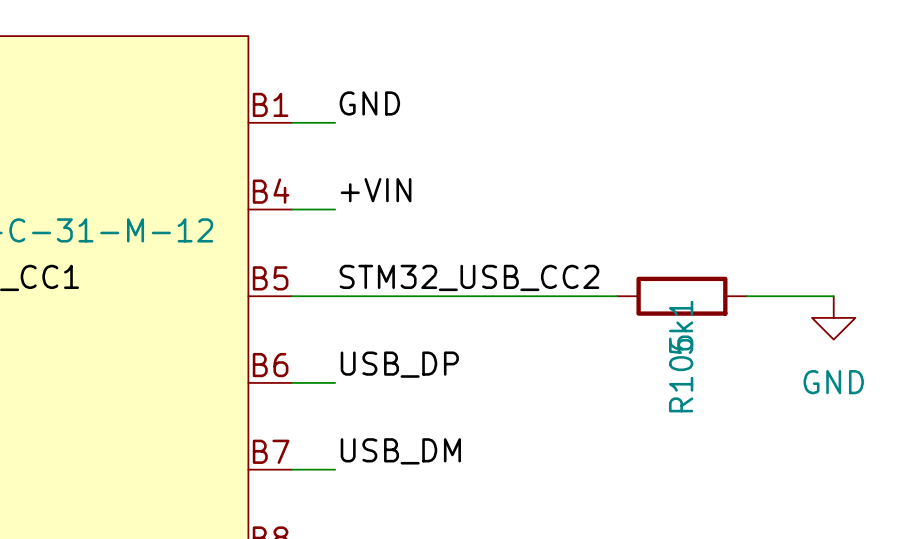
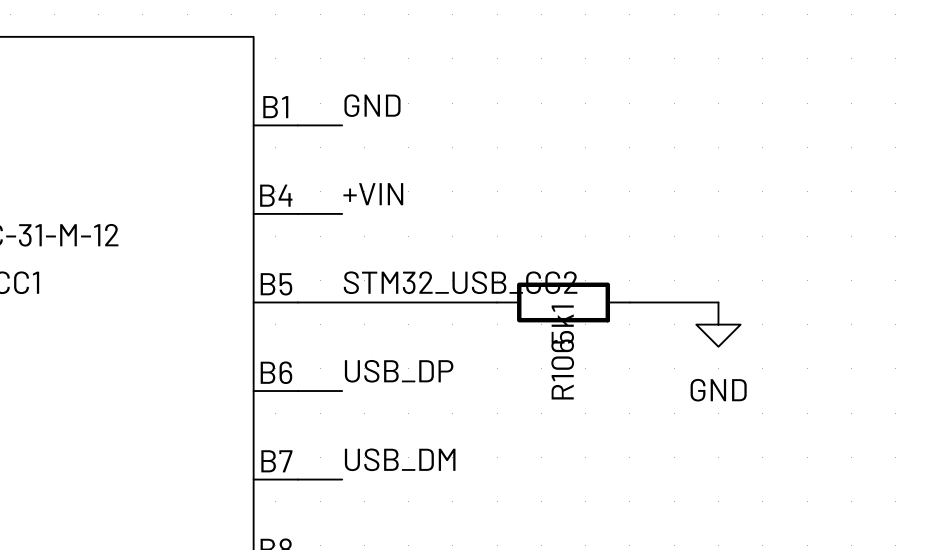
wire: (486, 296) (616, 296) -> (718, 302) (629, 302)
R106 position: (681, 296) -> (563, 302)
wire: (747, 296) (833, 296) -> none
power symbol position: GND (833, 317) -> GND (718, 324)

